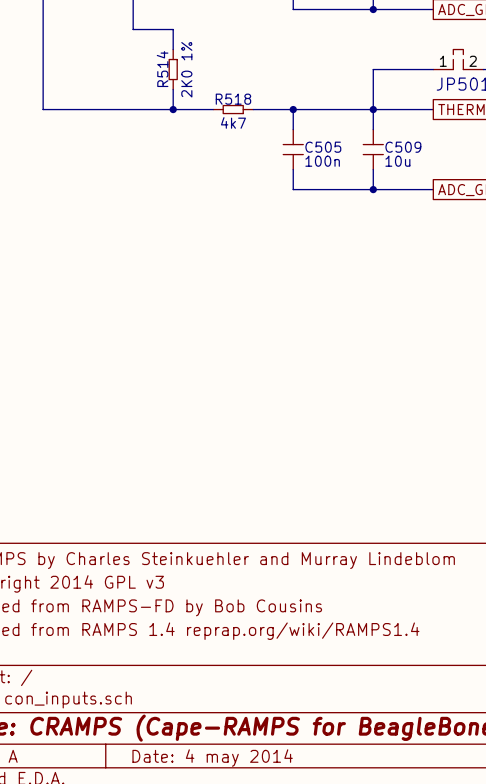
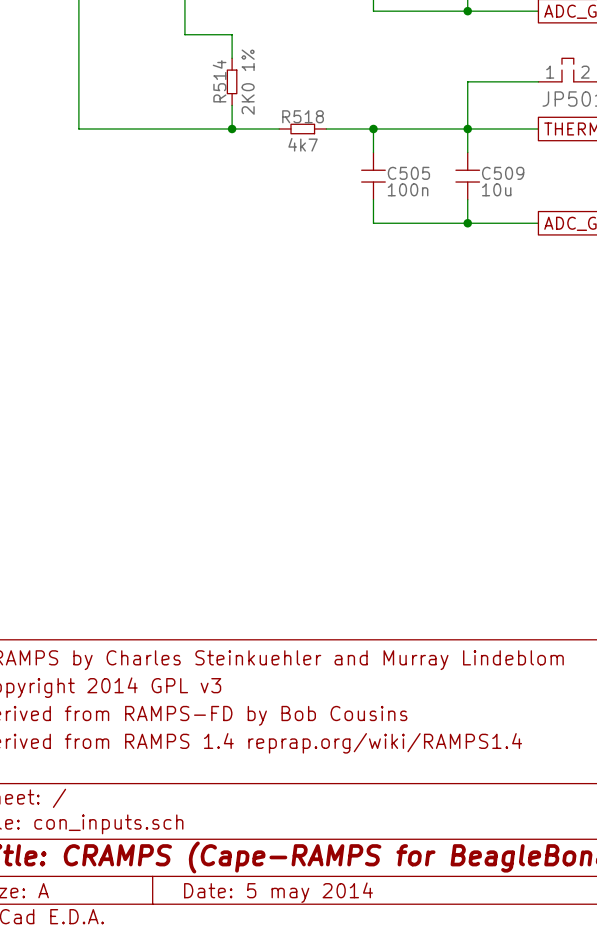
title block: Date: 4 may 2014 (212, 758) -> Date: 5 may 2014 (278, 892)

